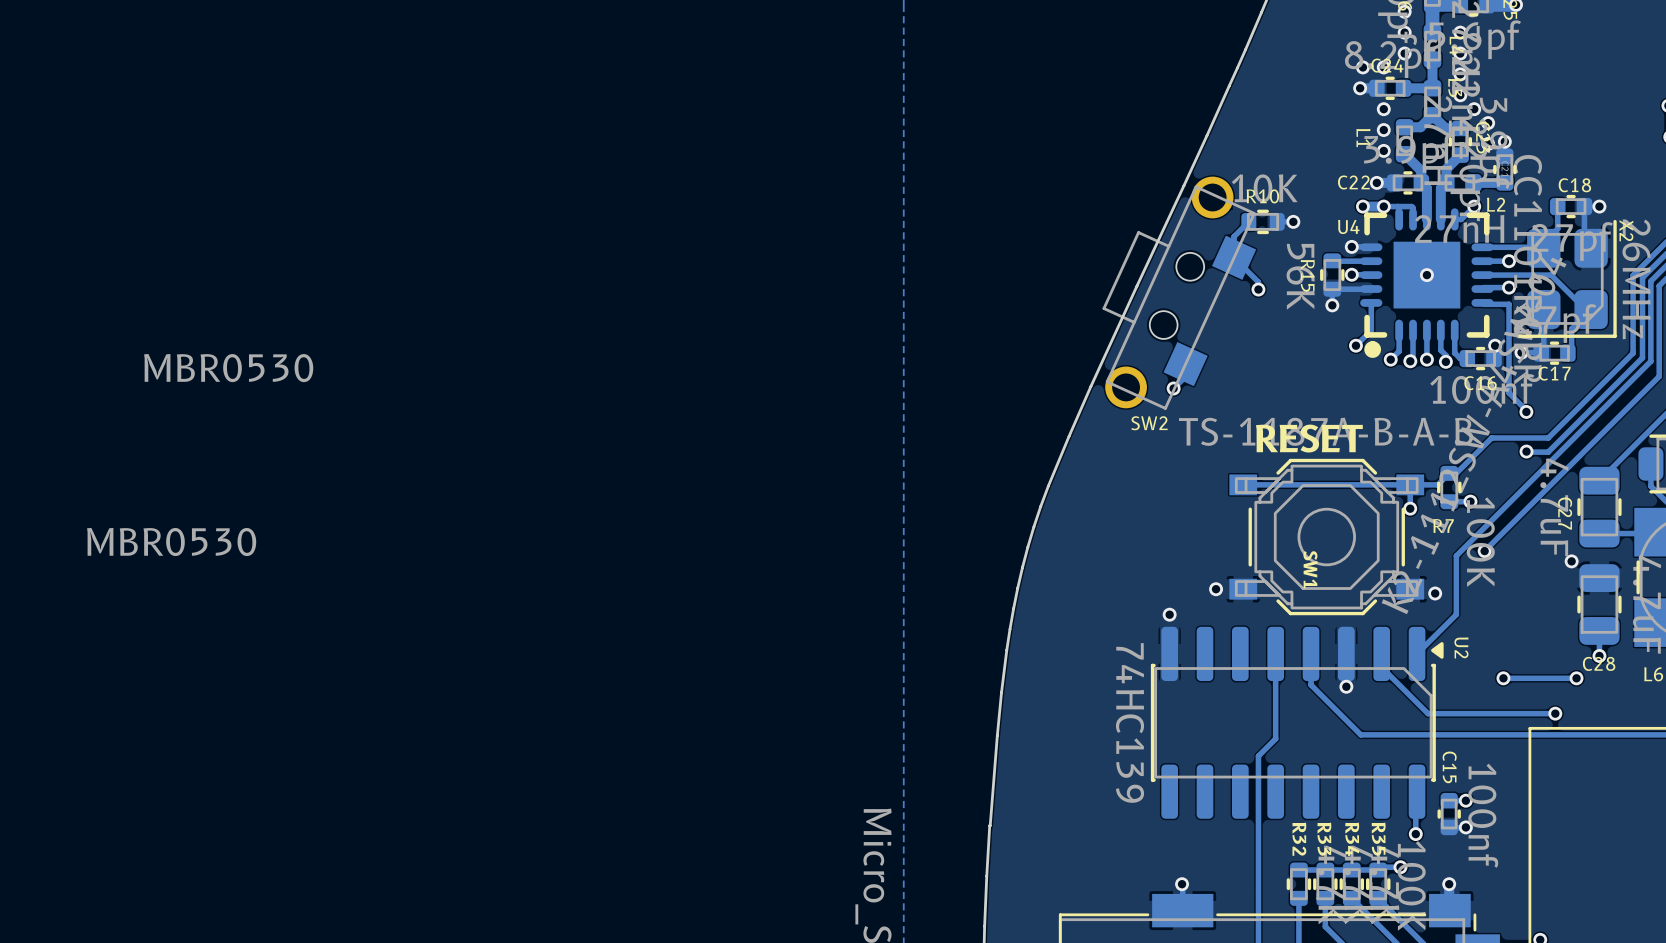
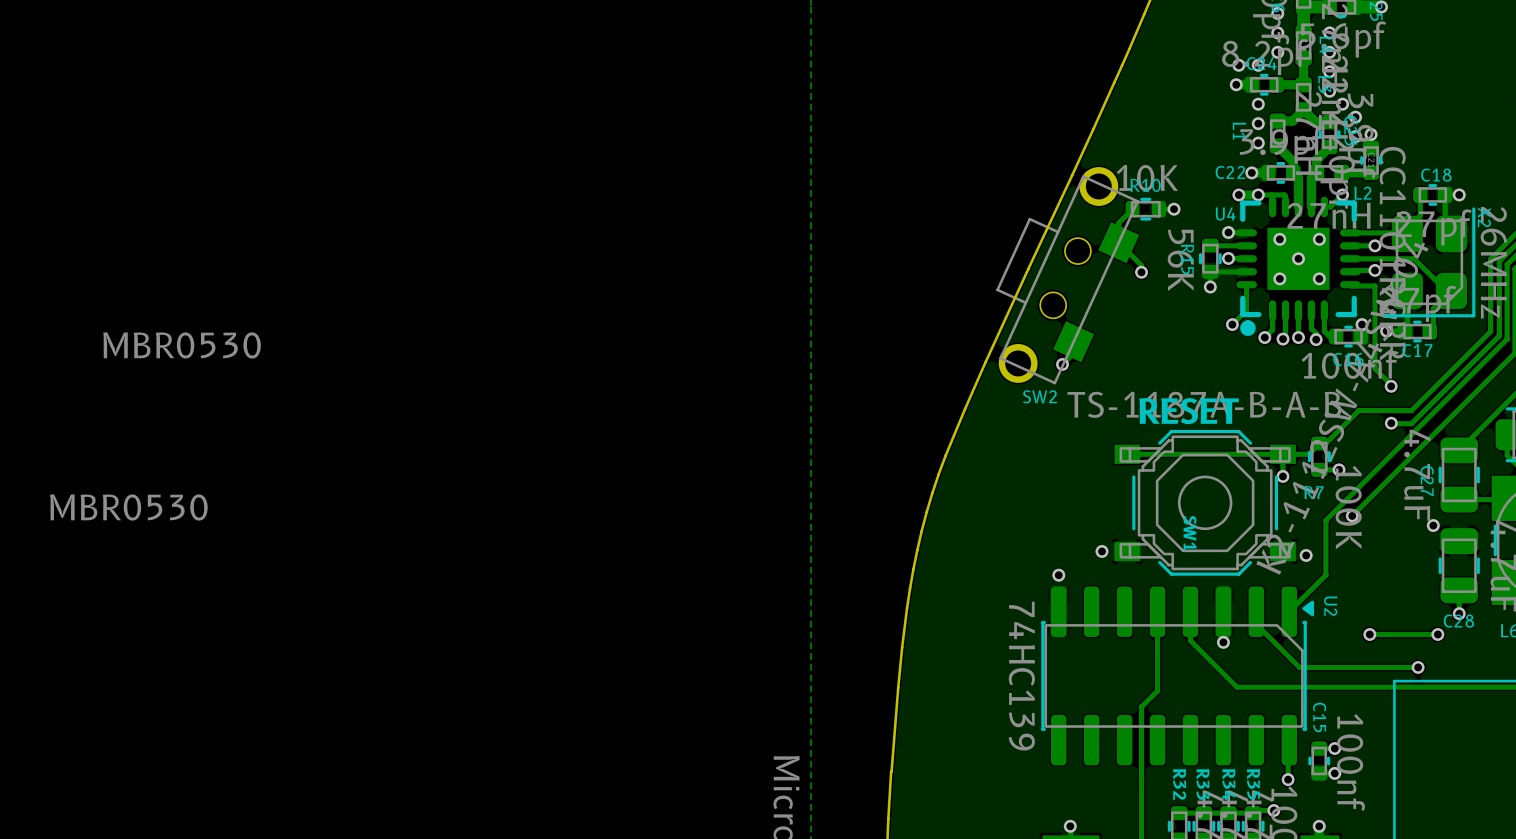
via: none -> (1279, 239)
via: none -> (1319, 239)
via: none -> (1279, 278)
via: none -> (1319, 278)

